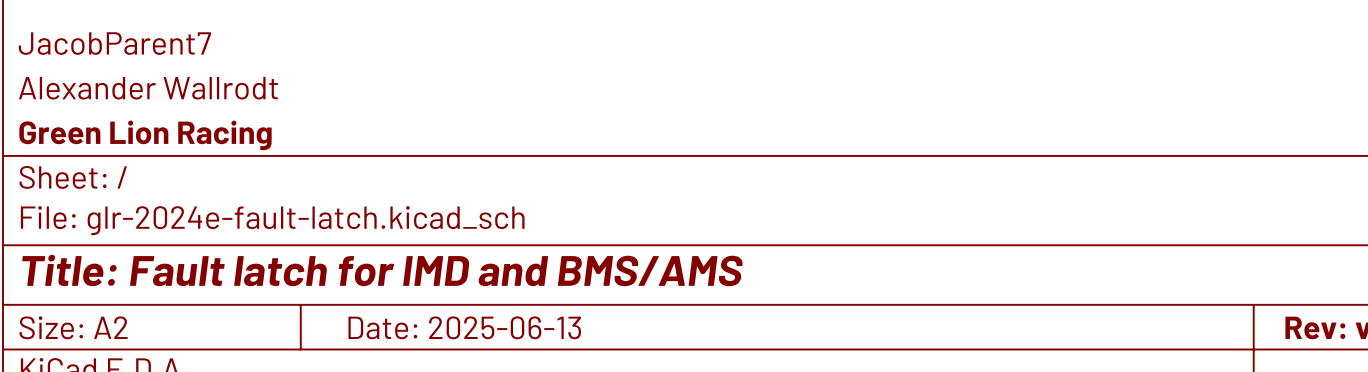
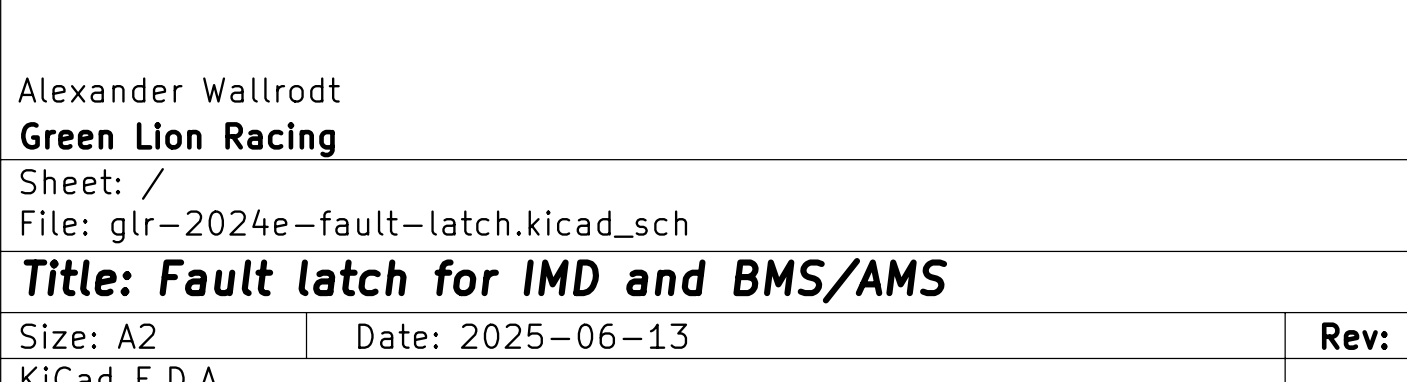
title block: JacobParent7 (114, 43) -> none

